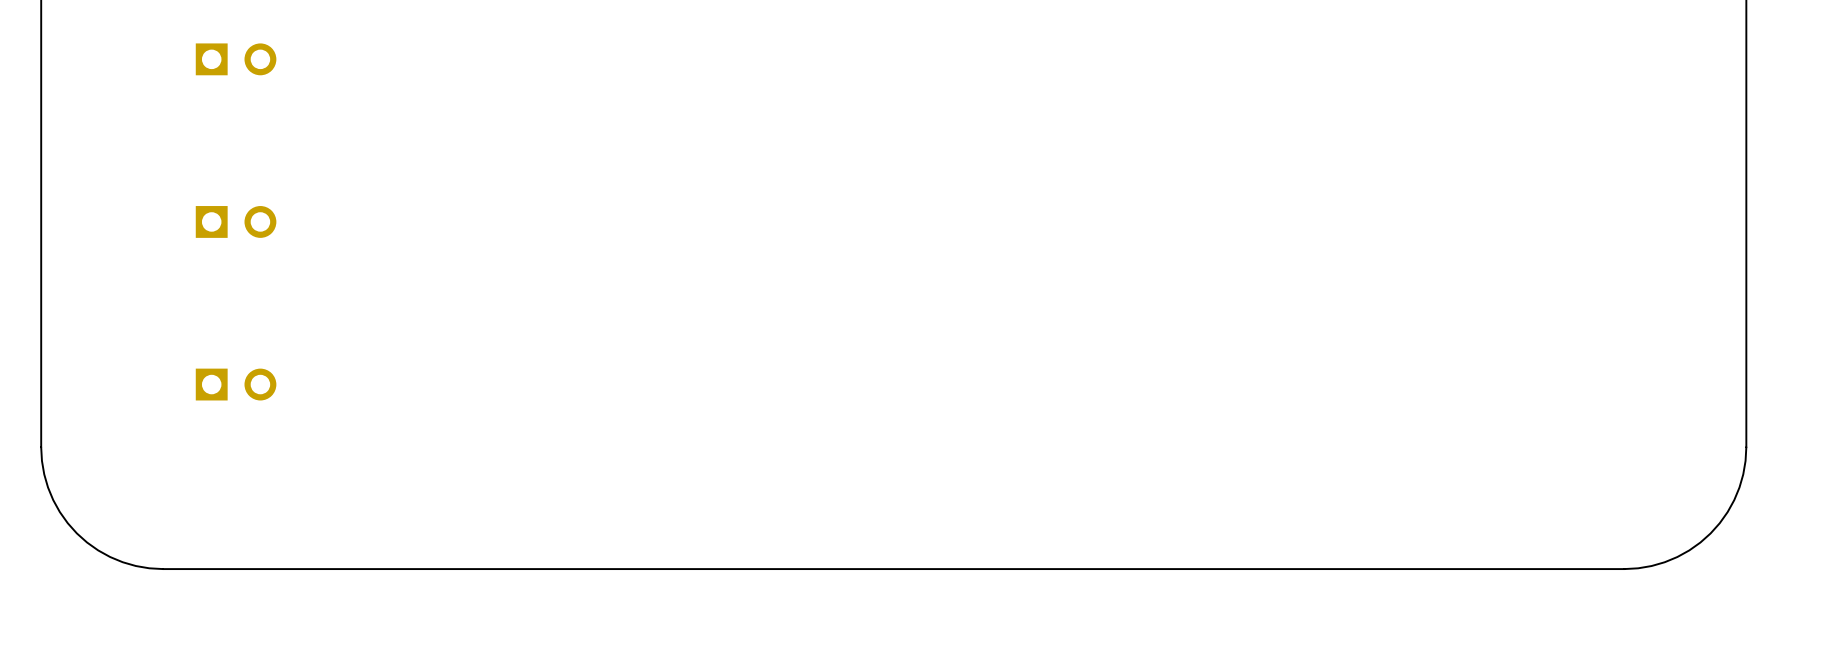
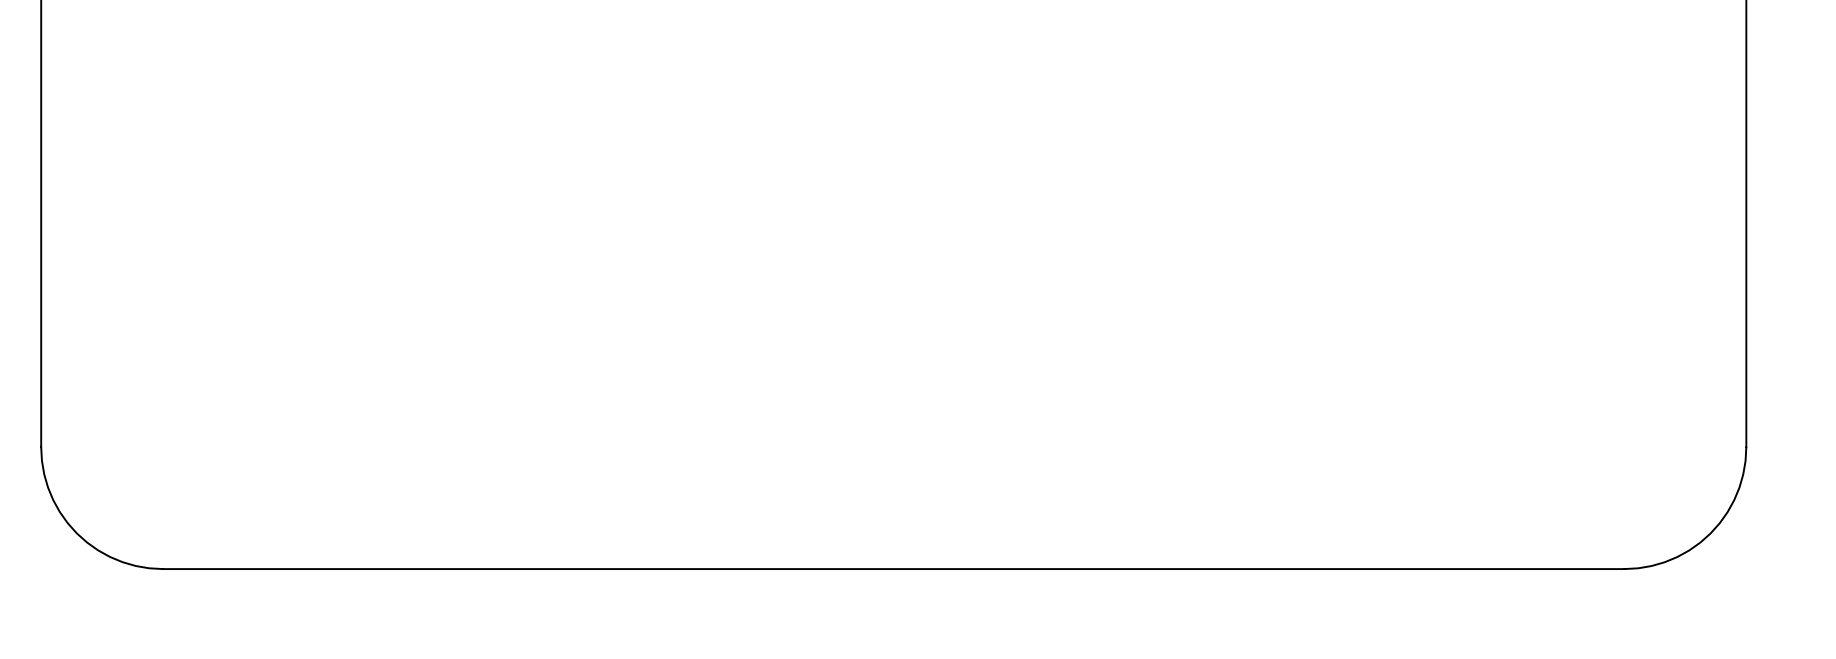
part: (236, 59) -> none
part: (236, 221) -> none
part: (236, 384) -> none

